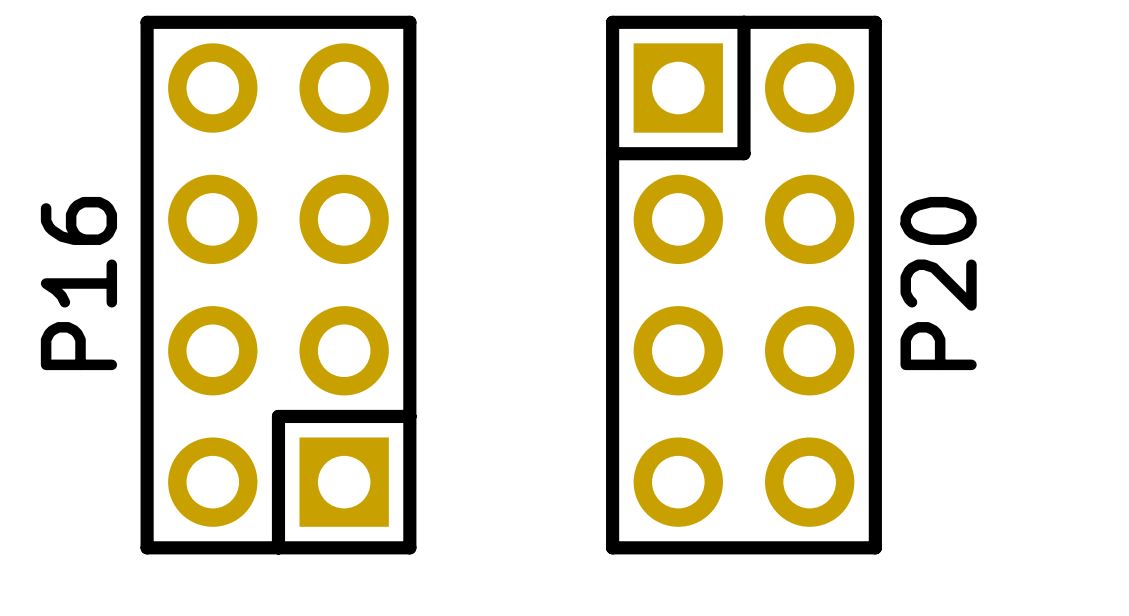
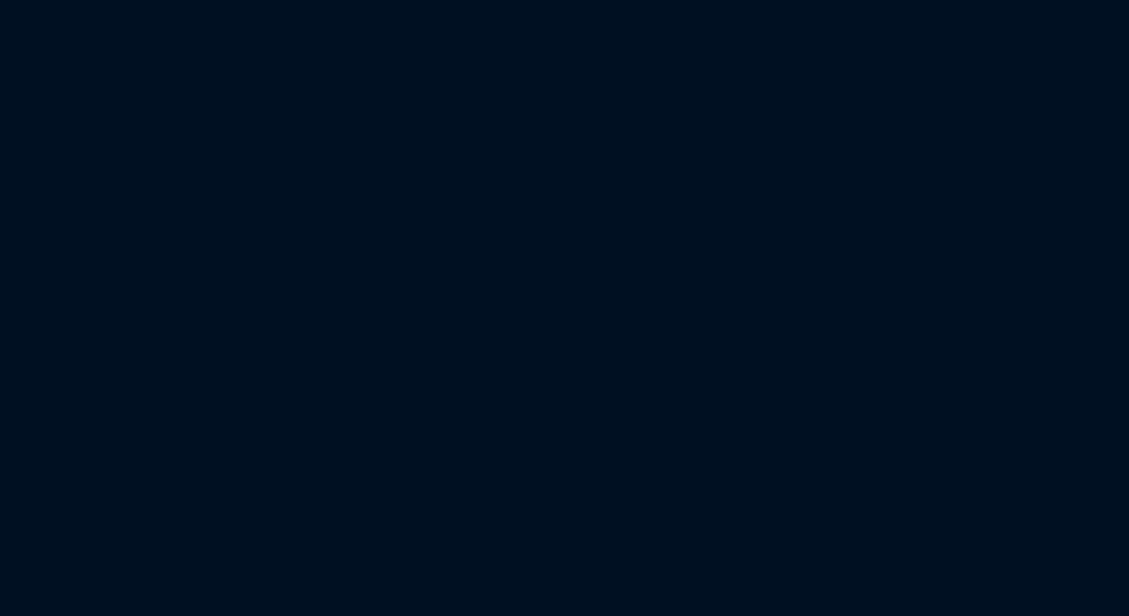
P16: (278, 285) -> none
P20: (743, 285) -> none

